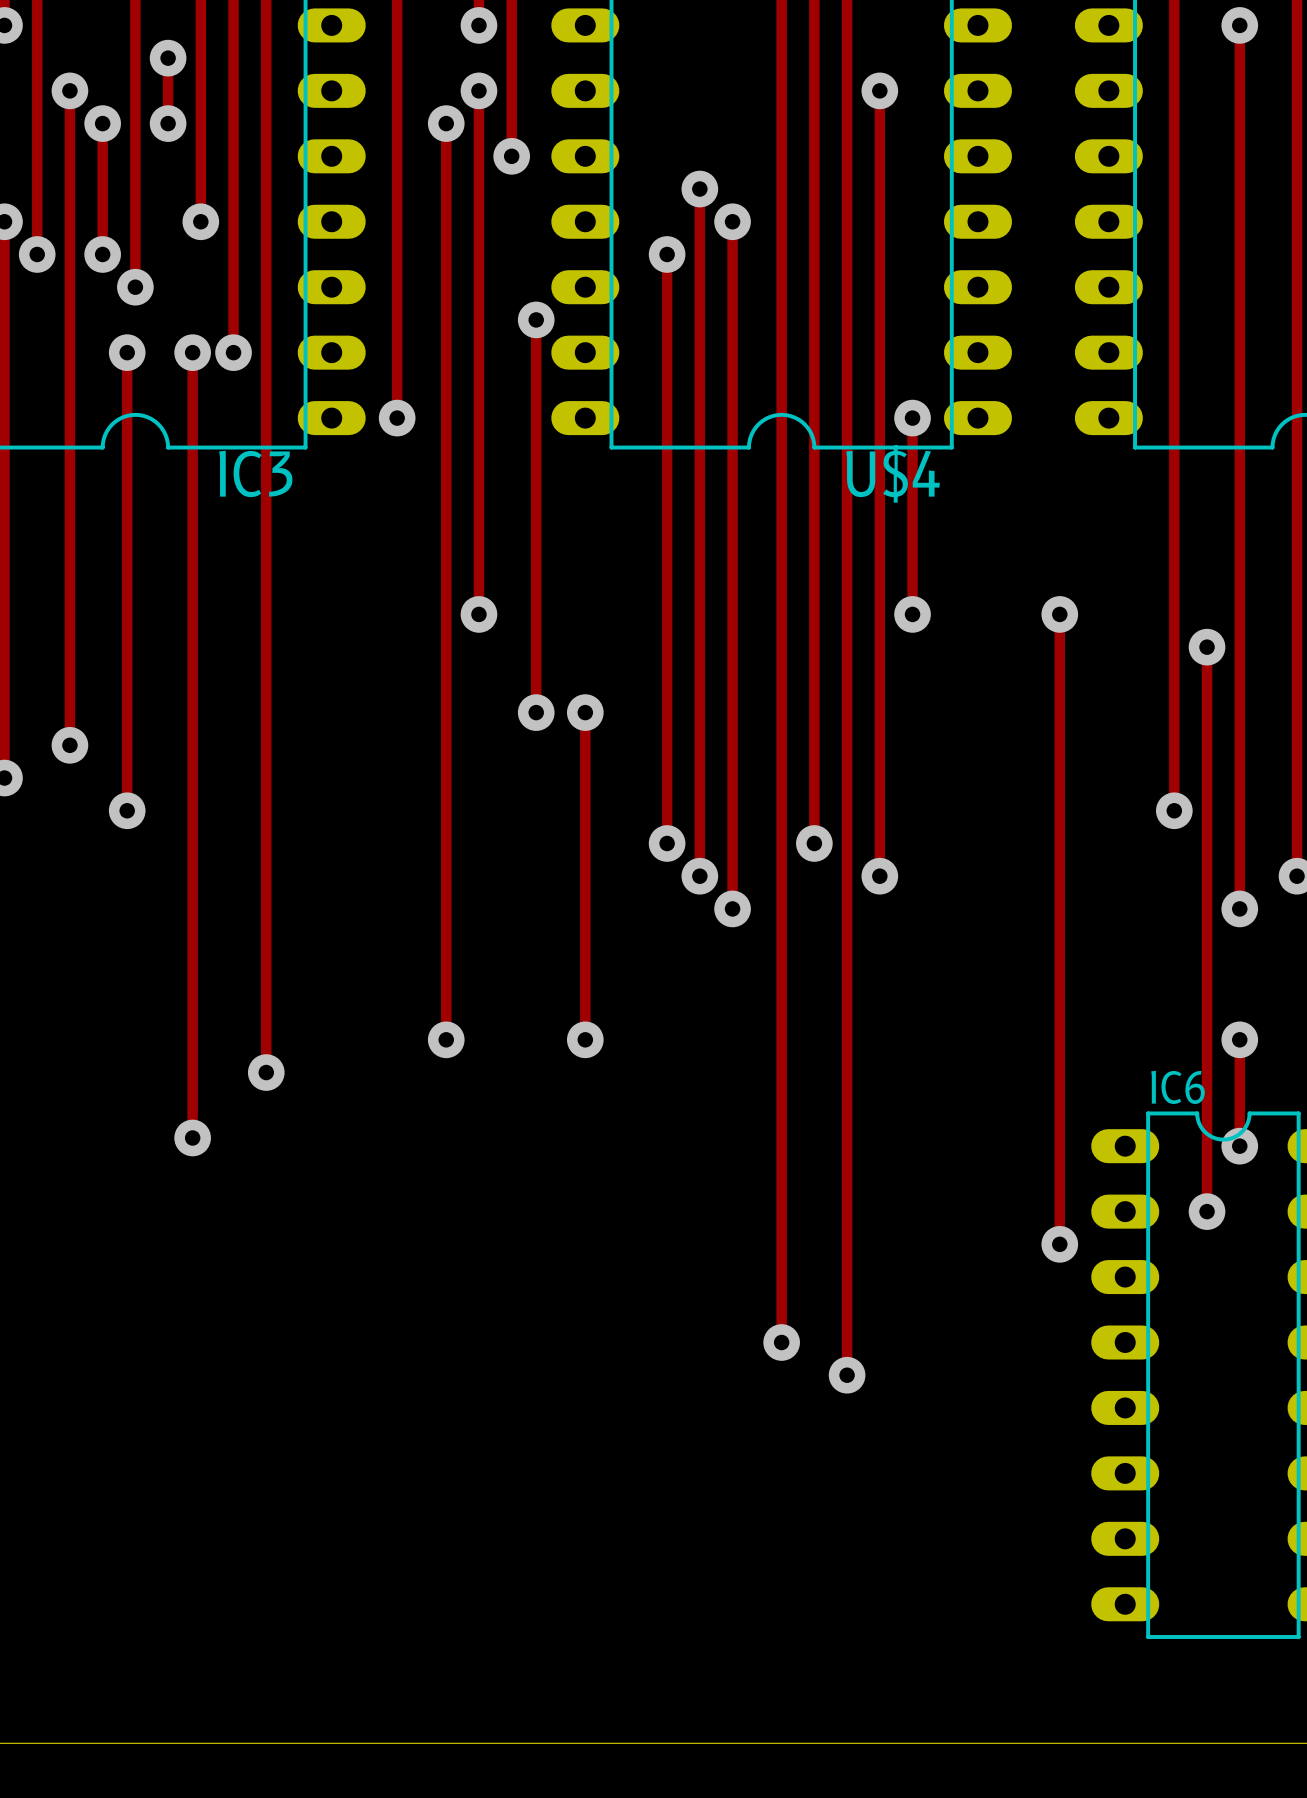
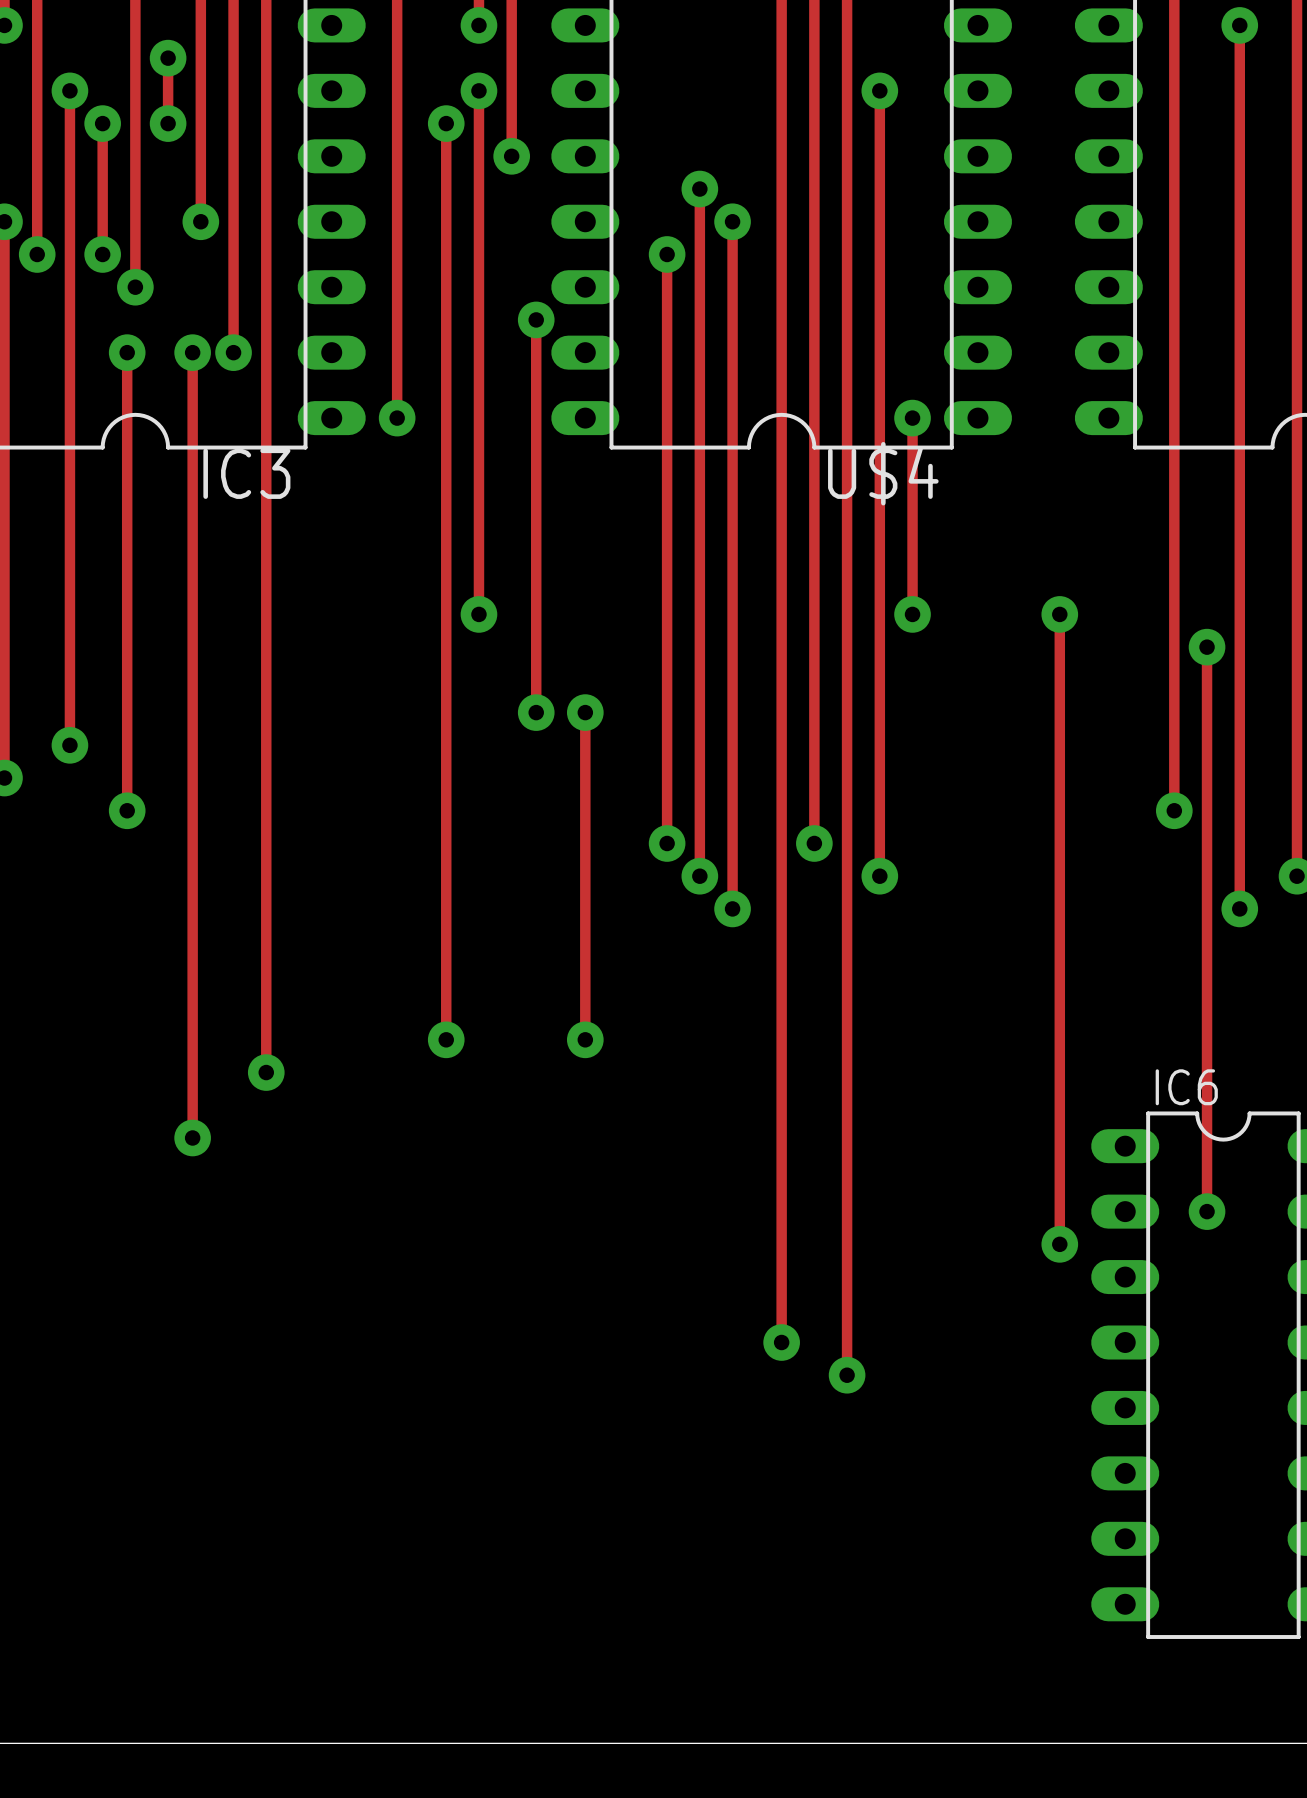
track: (1239, 1039) (1239, 1146) -> none
via: (1239, 1039) -> none
via: (1239, 1146) -> none

